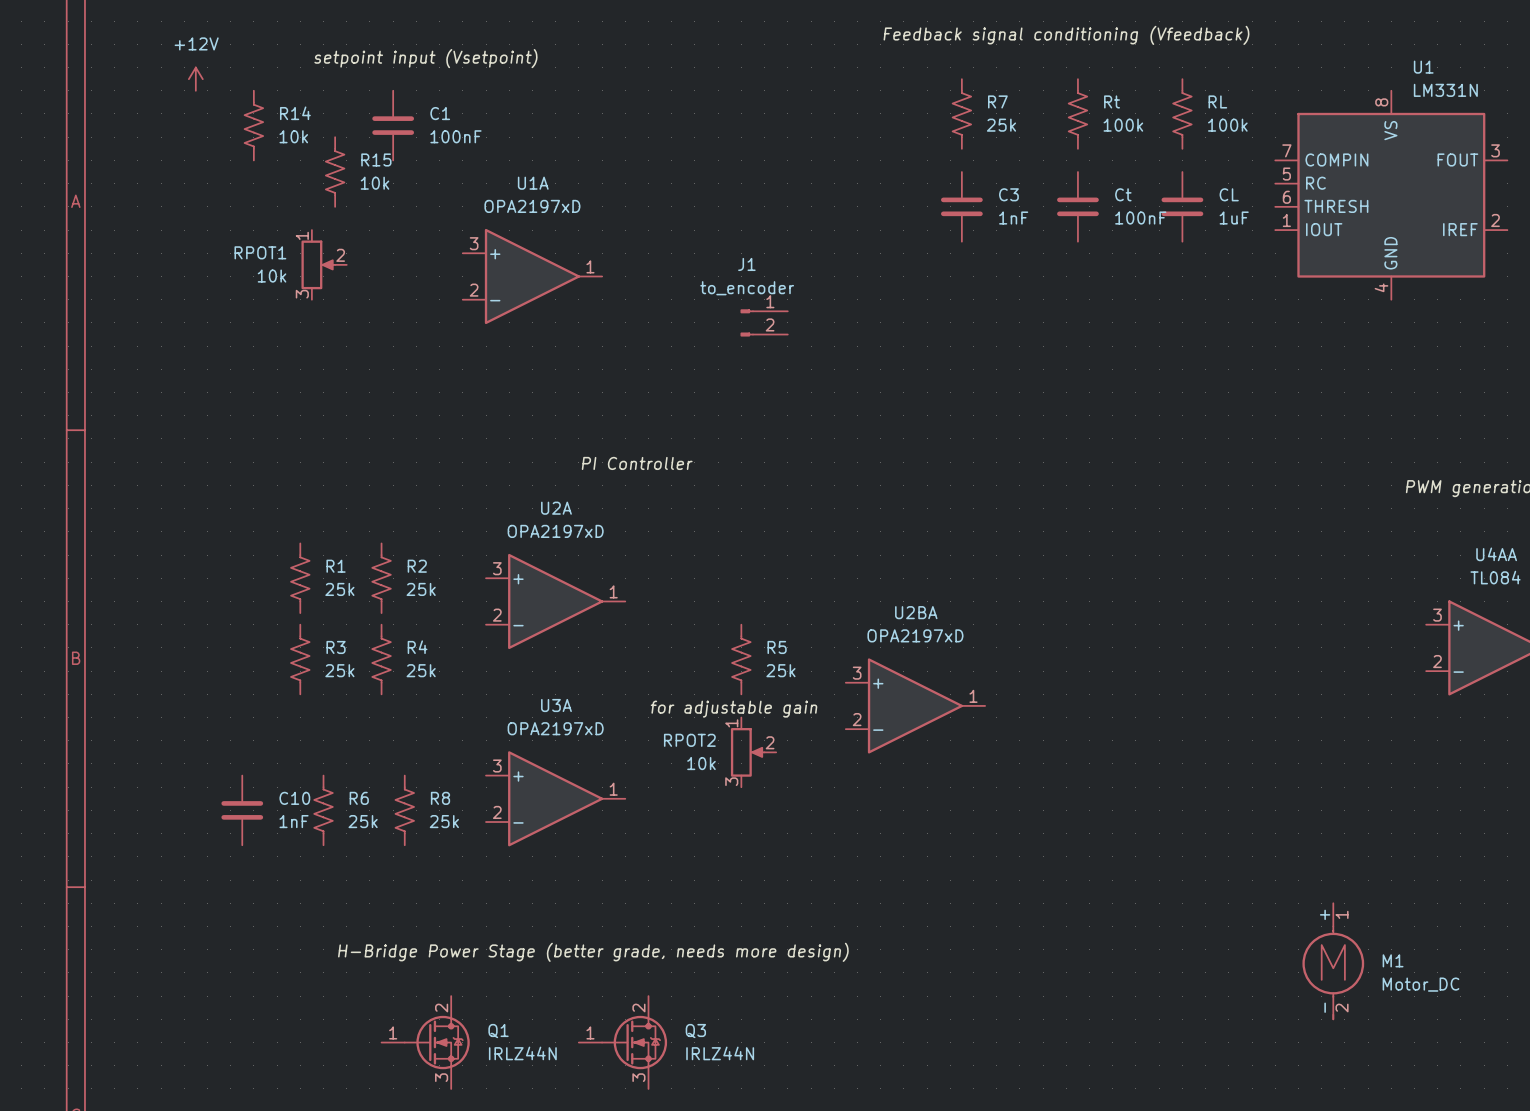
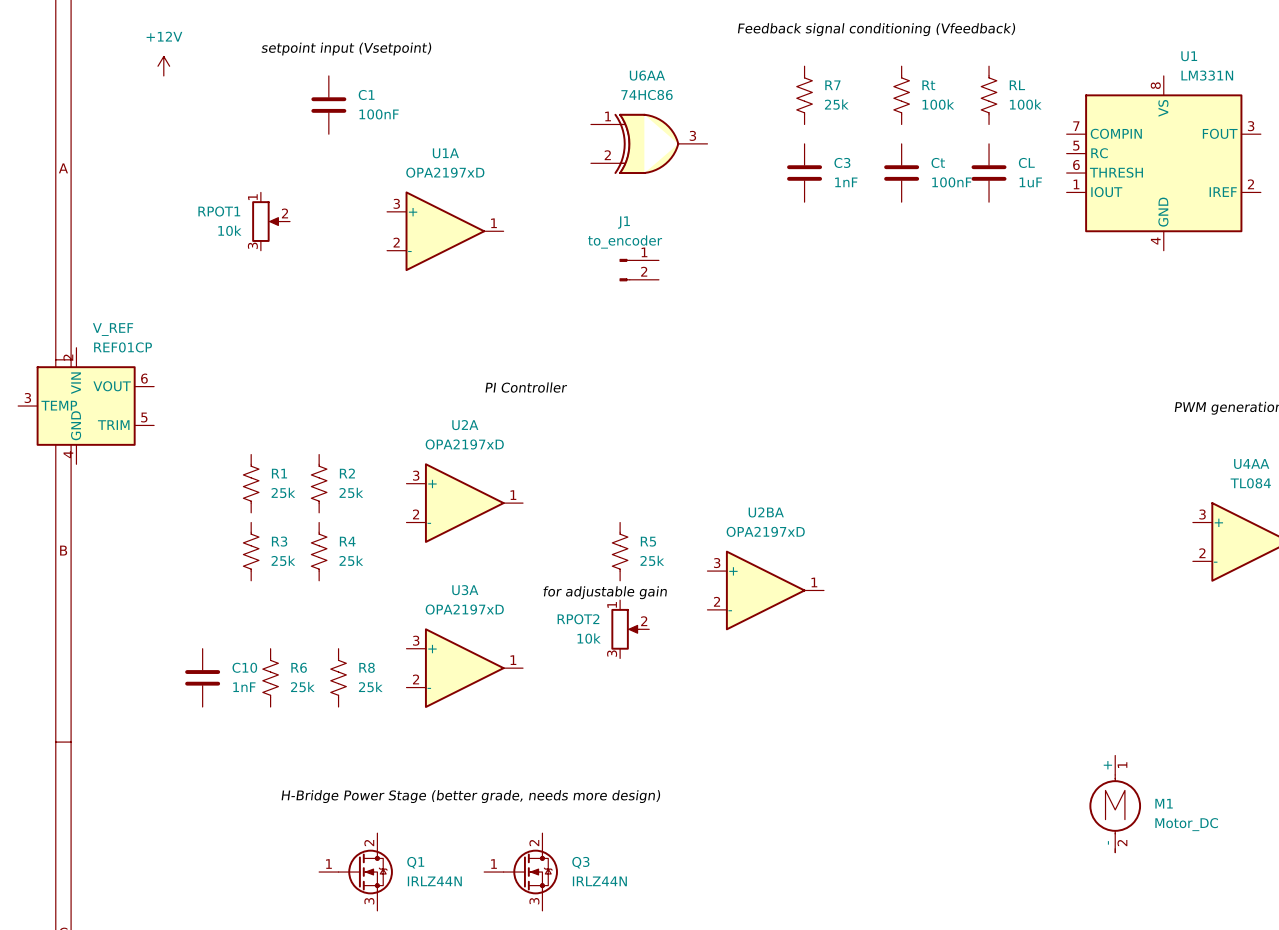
R14: 10k (253, 125) -> none
R15: 10k (335, 172) -> none
U6AA: none -> 74HC86 (649, 143)
V_REF: none -> REF01CP (86, 406)

